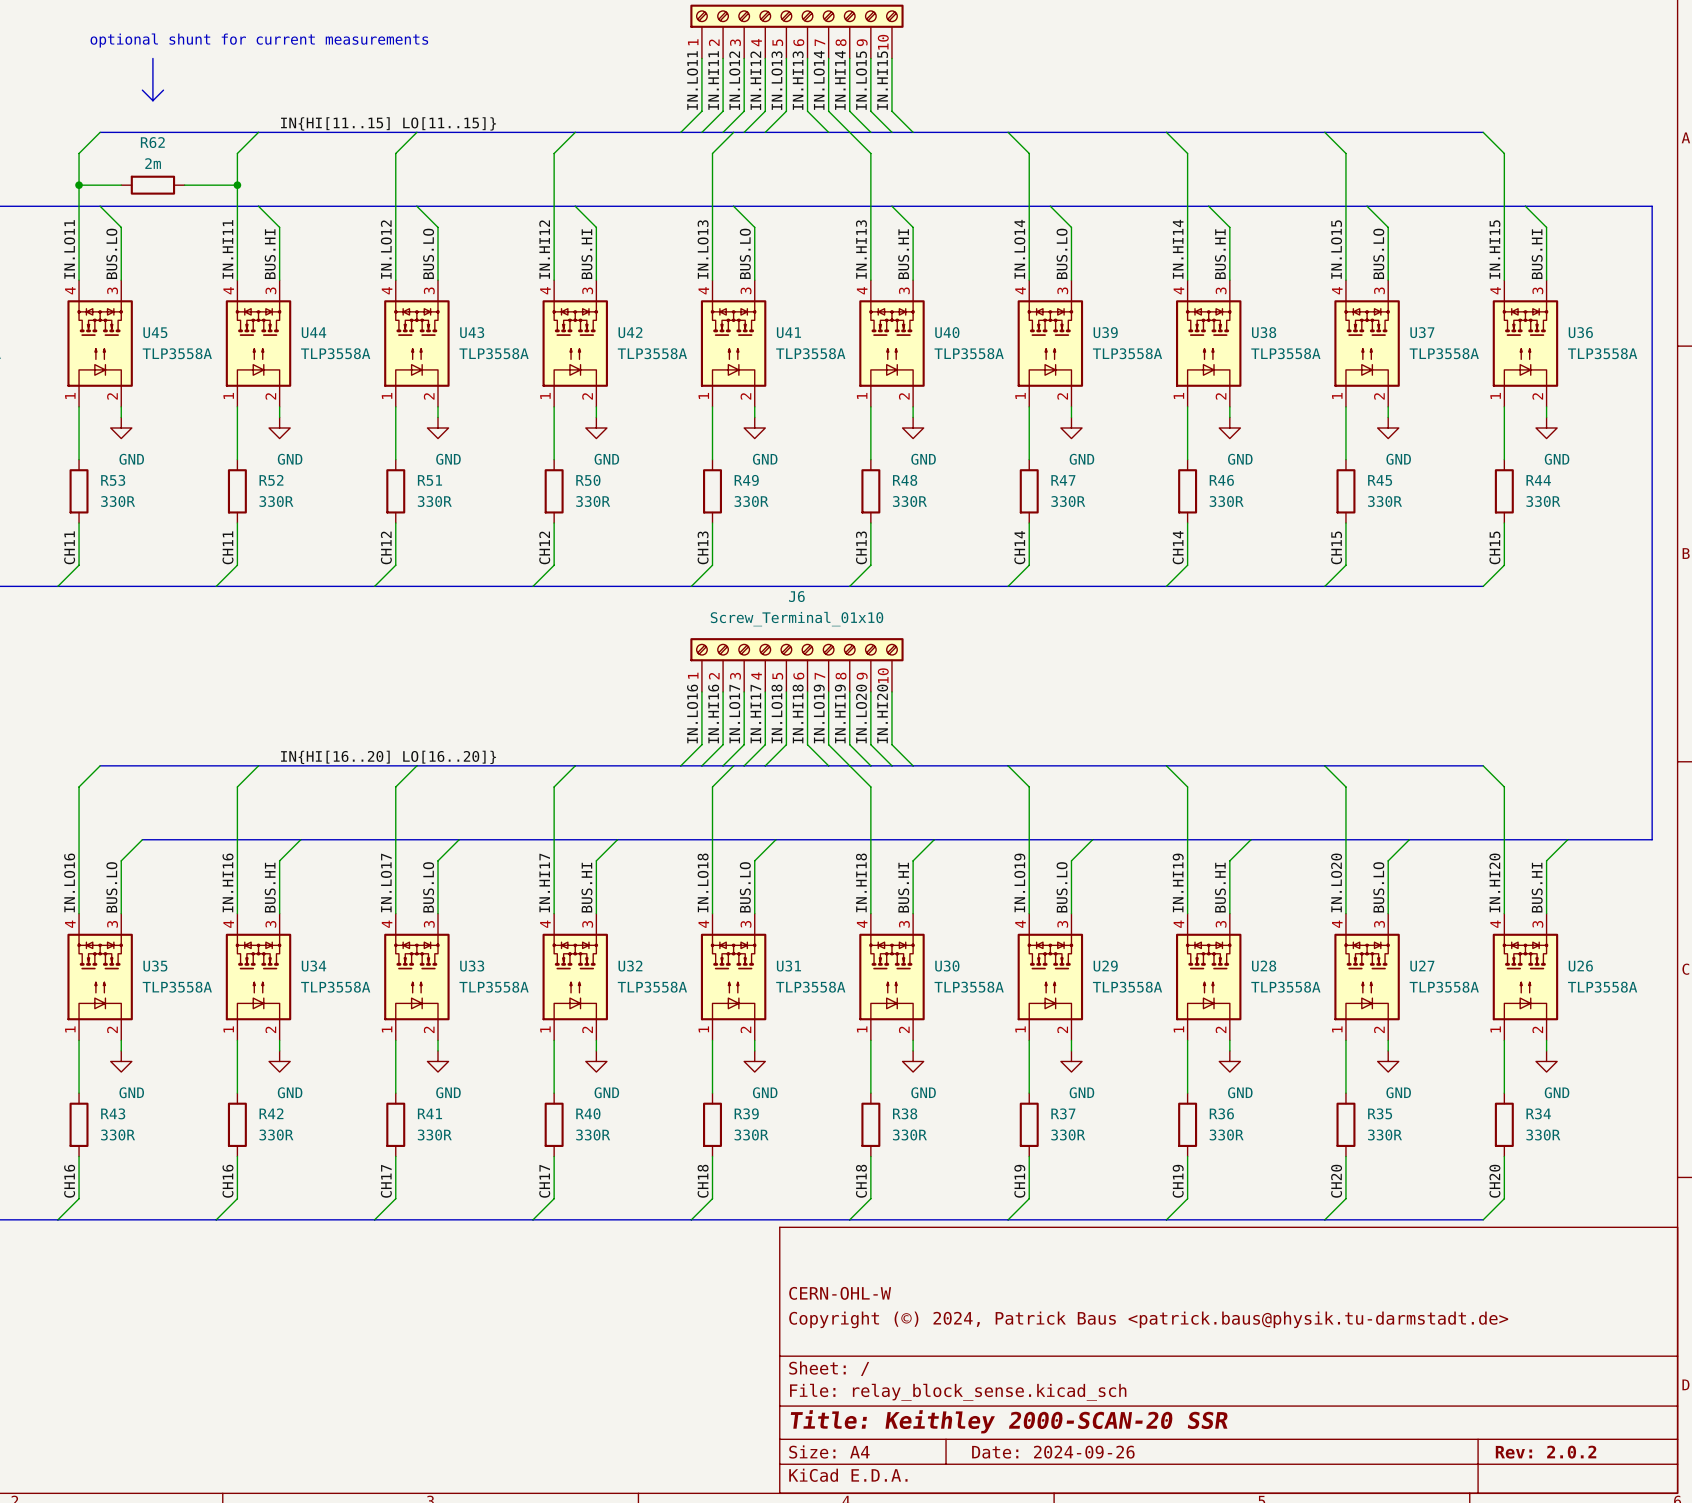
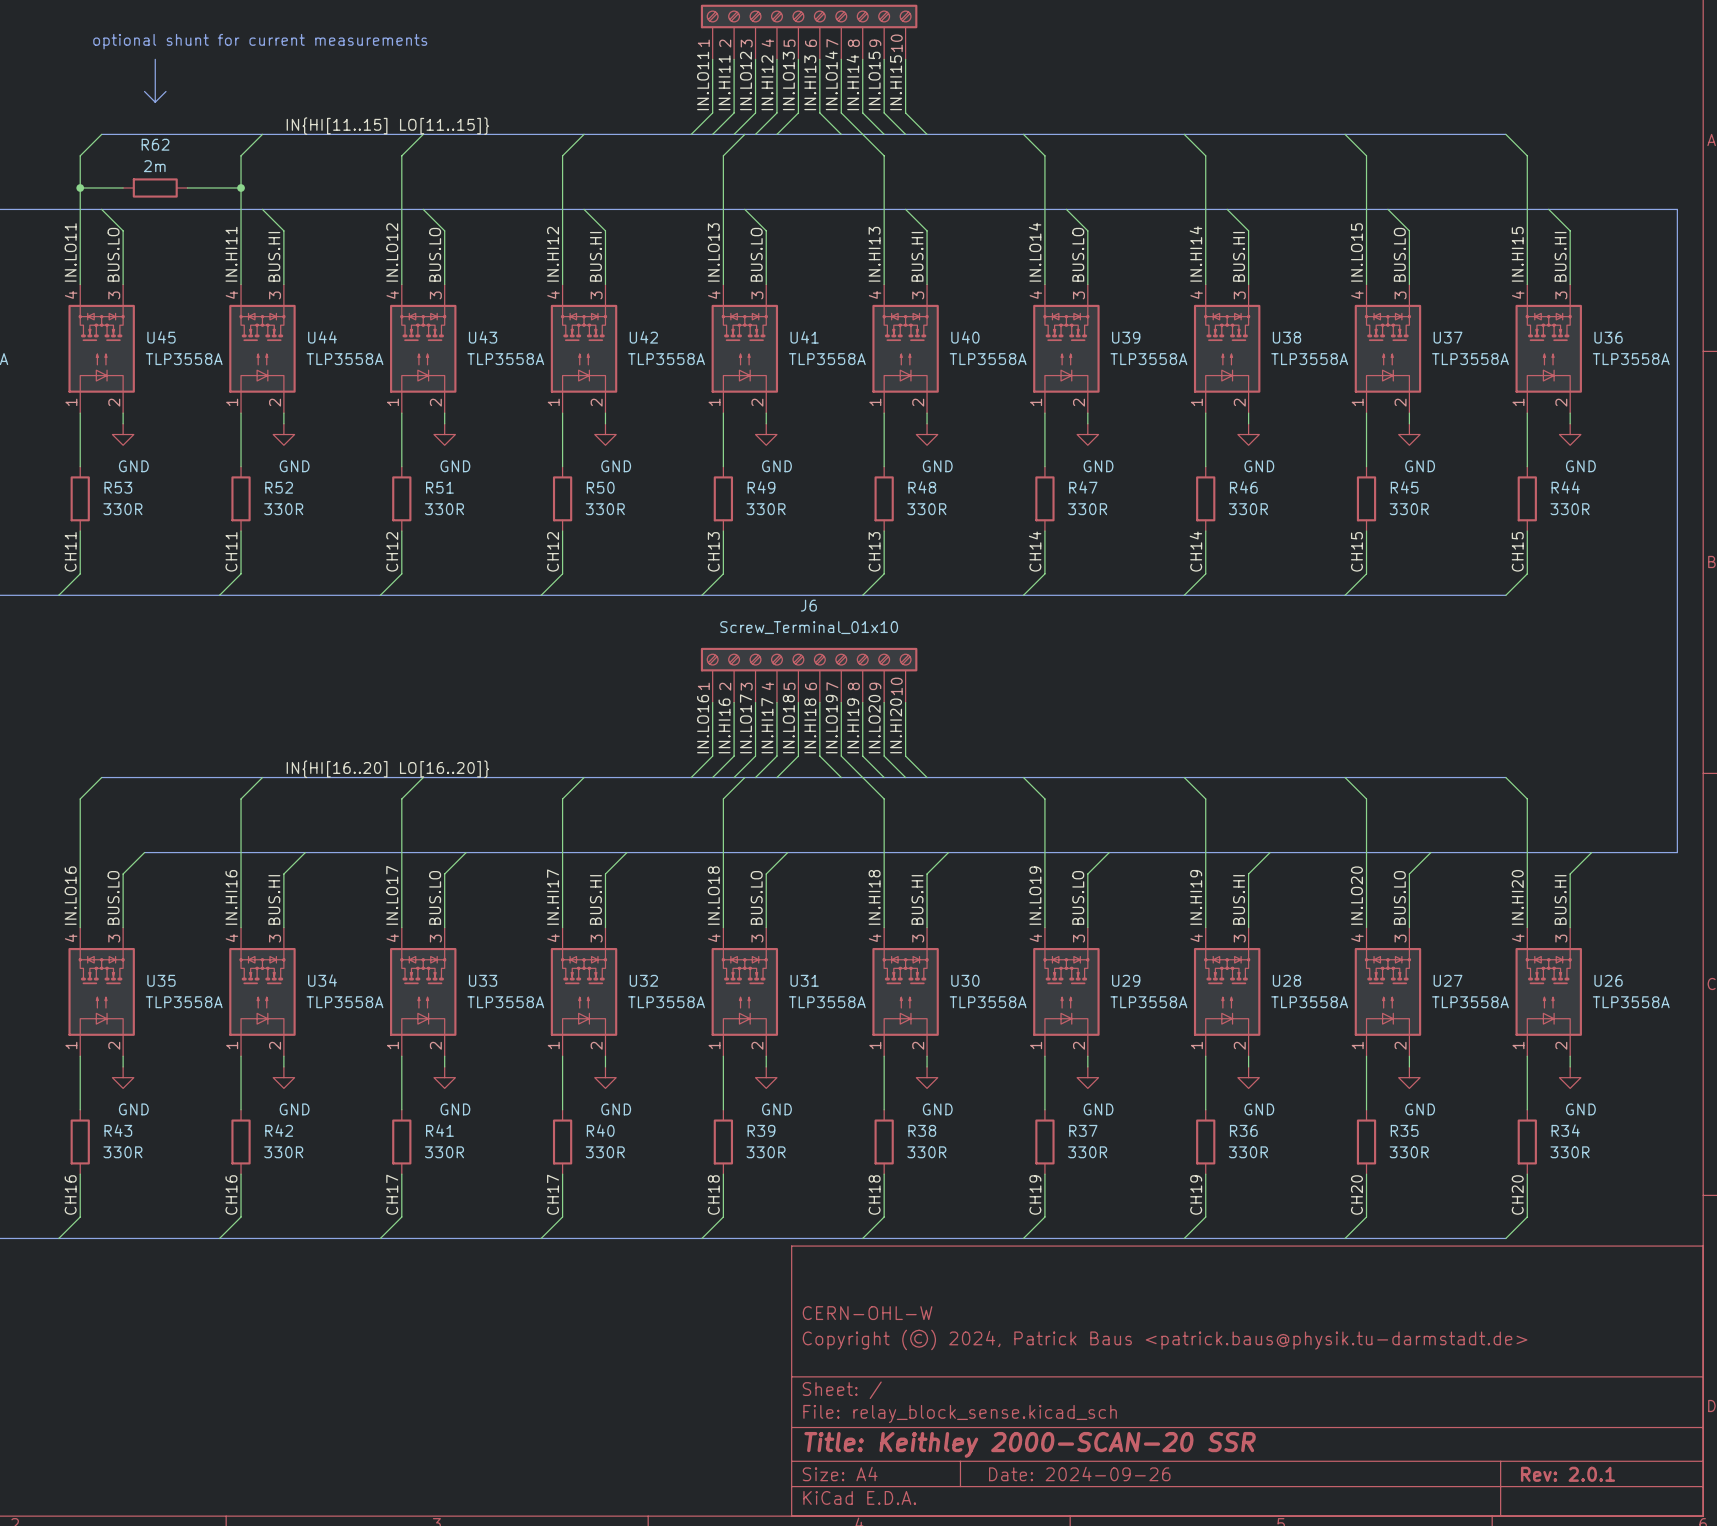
title block: Rev: 2.0.2 (1546, 1452) -> Rev: 2.0.1 (1568, 1474)

